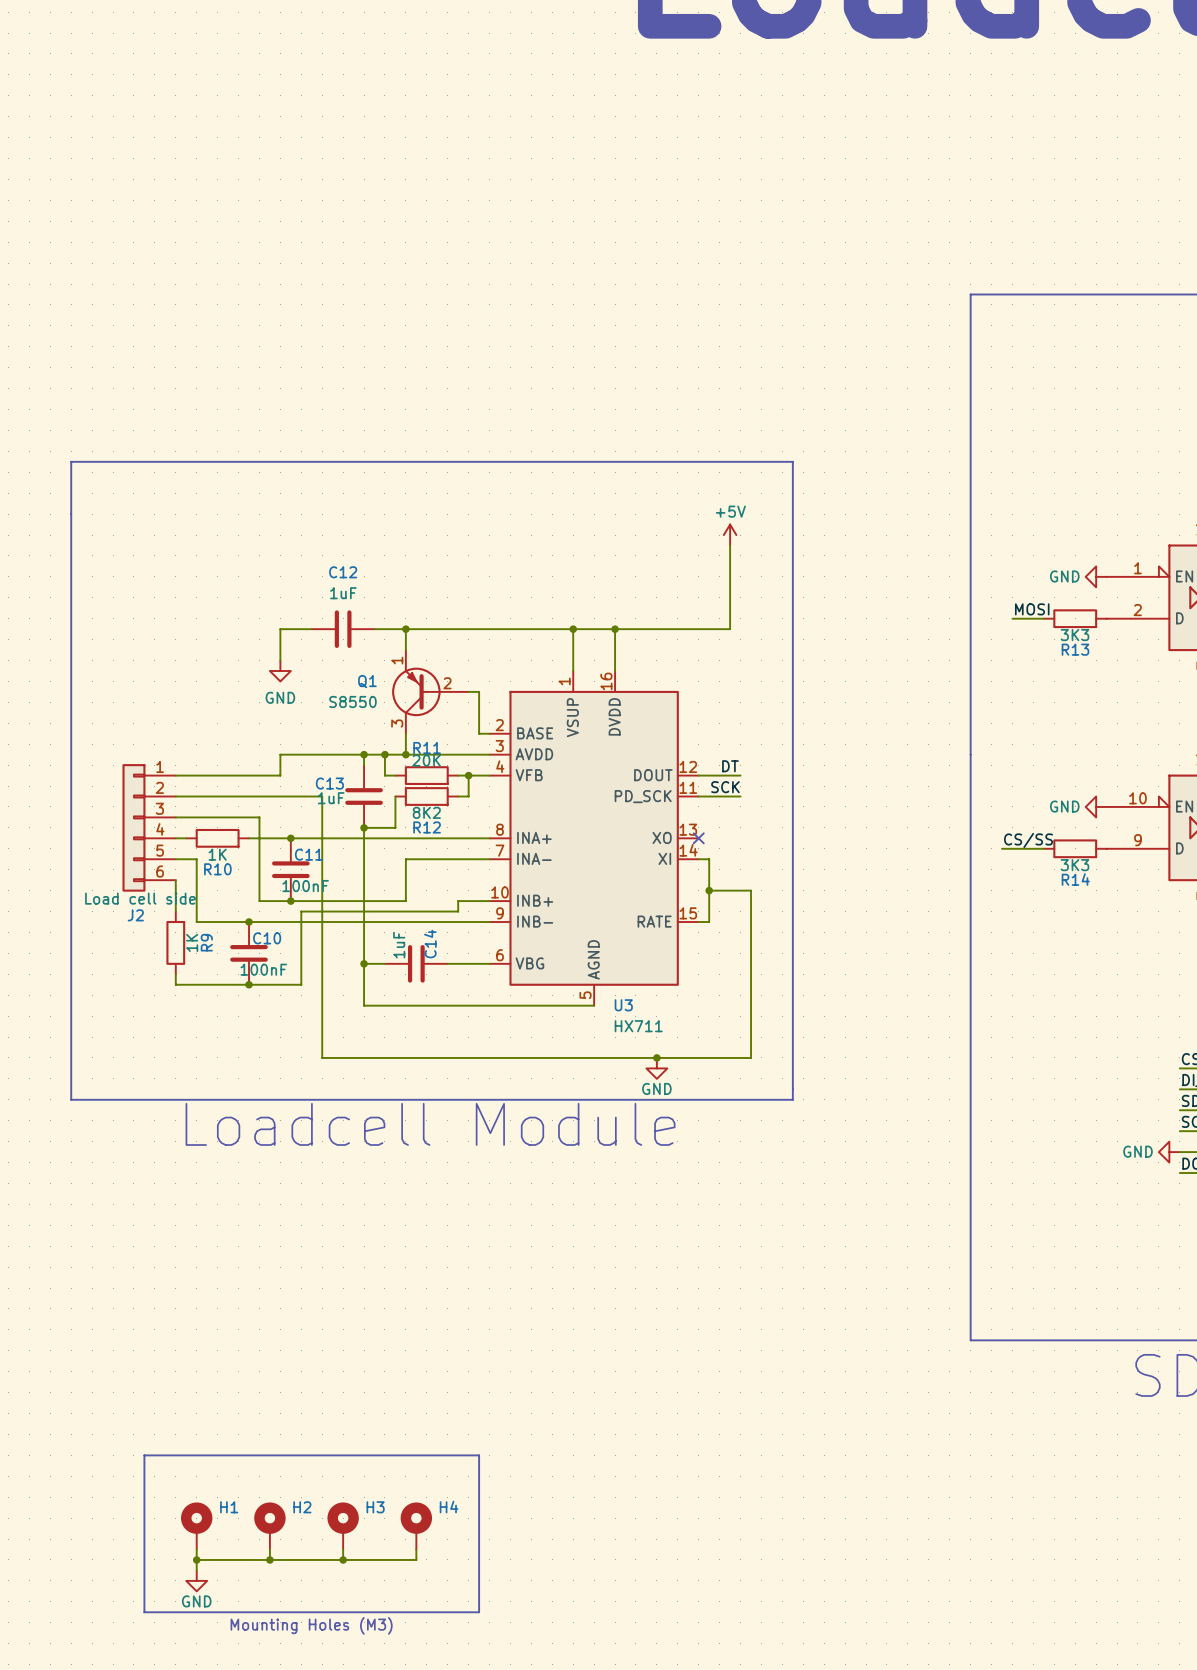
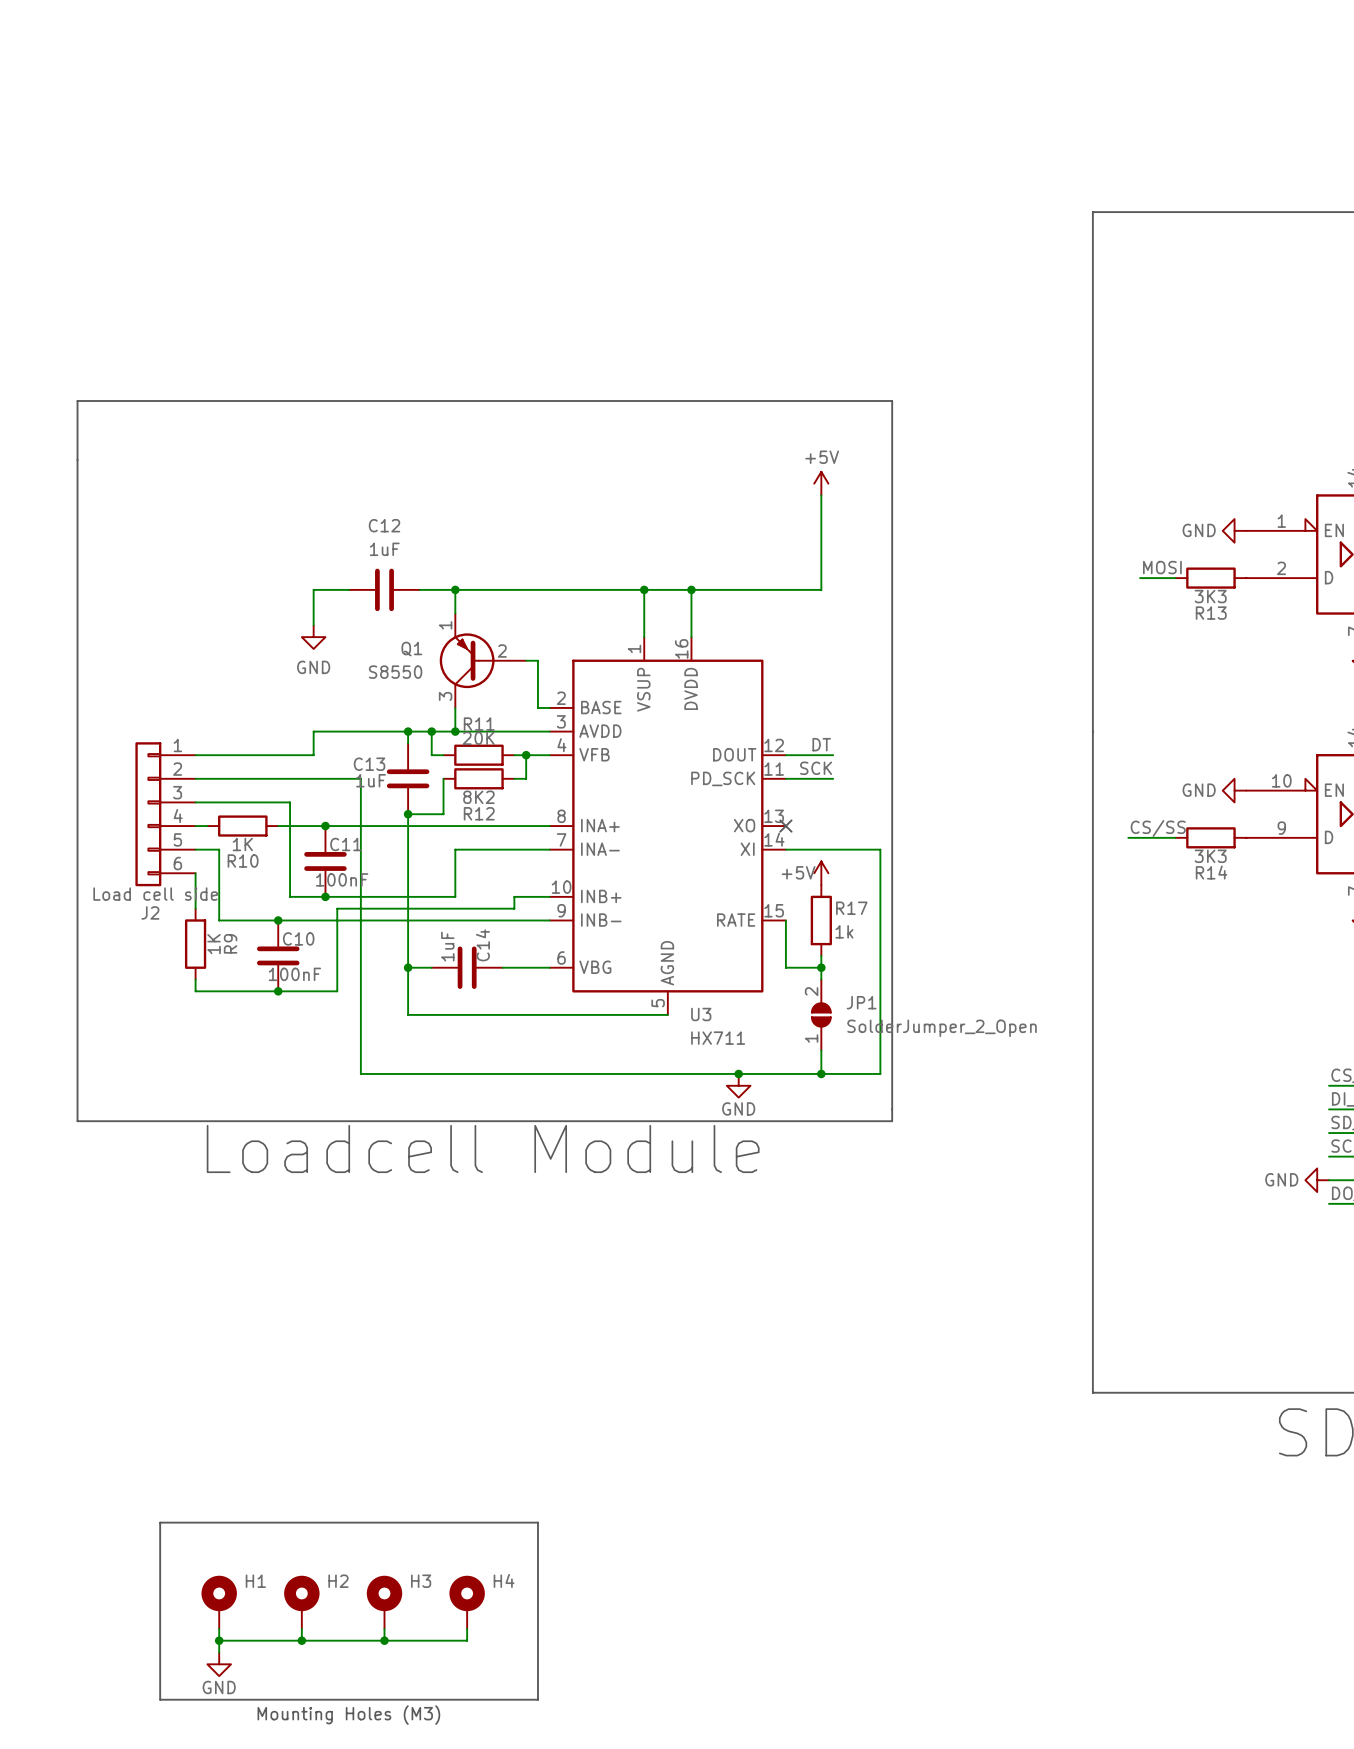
wire: (709, 859) (709, 922) (698, 922) -> (821, 967) (785, 967) (785, 920)
power symbol: none -> +5V (821, 873)
wire: (709, 890) (751, 890) (751, 1057) -> (797, 849) (880, 849) (880, 1073) (844, 1073)
junction: (709, 890) -> none
R17: none -> 1k (821, 920)
wire: none -> (821, 955) (821, 979)
junction: none -> (821, 967)
JP1: none -> SolderJumper_2_Open (821, 1014)
wire: none -> (821, 1050) (821, 1073)
junction: none -> (821, 1073)

